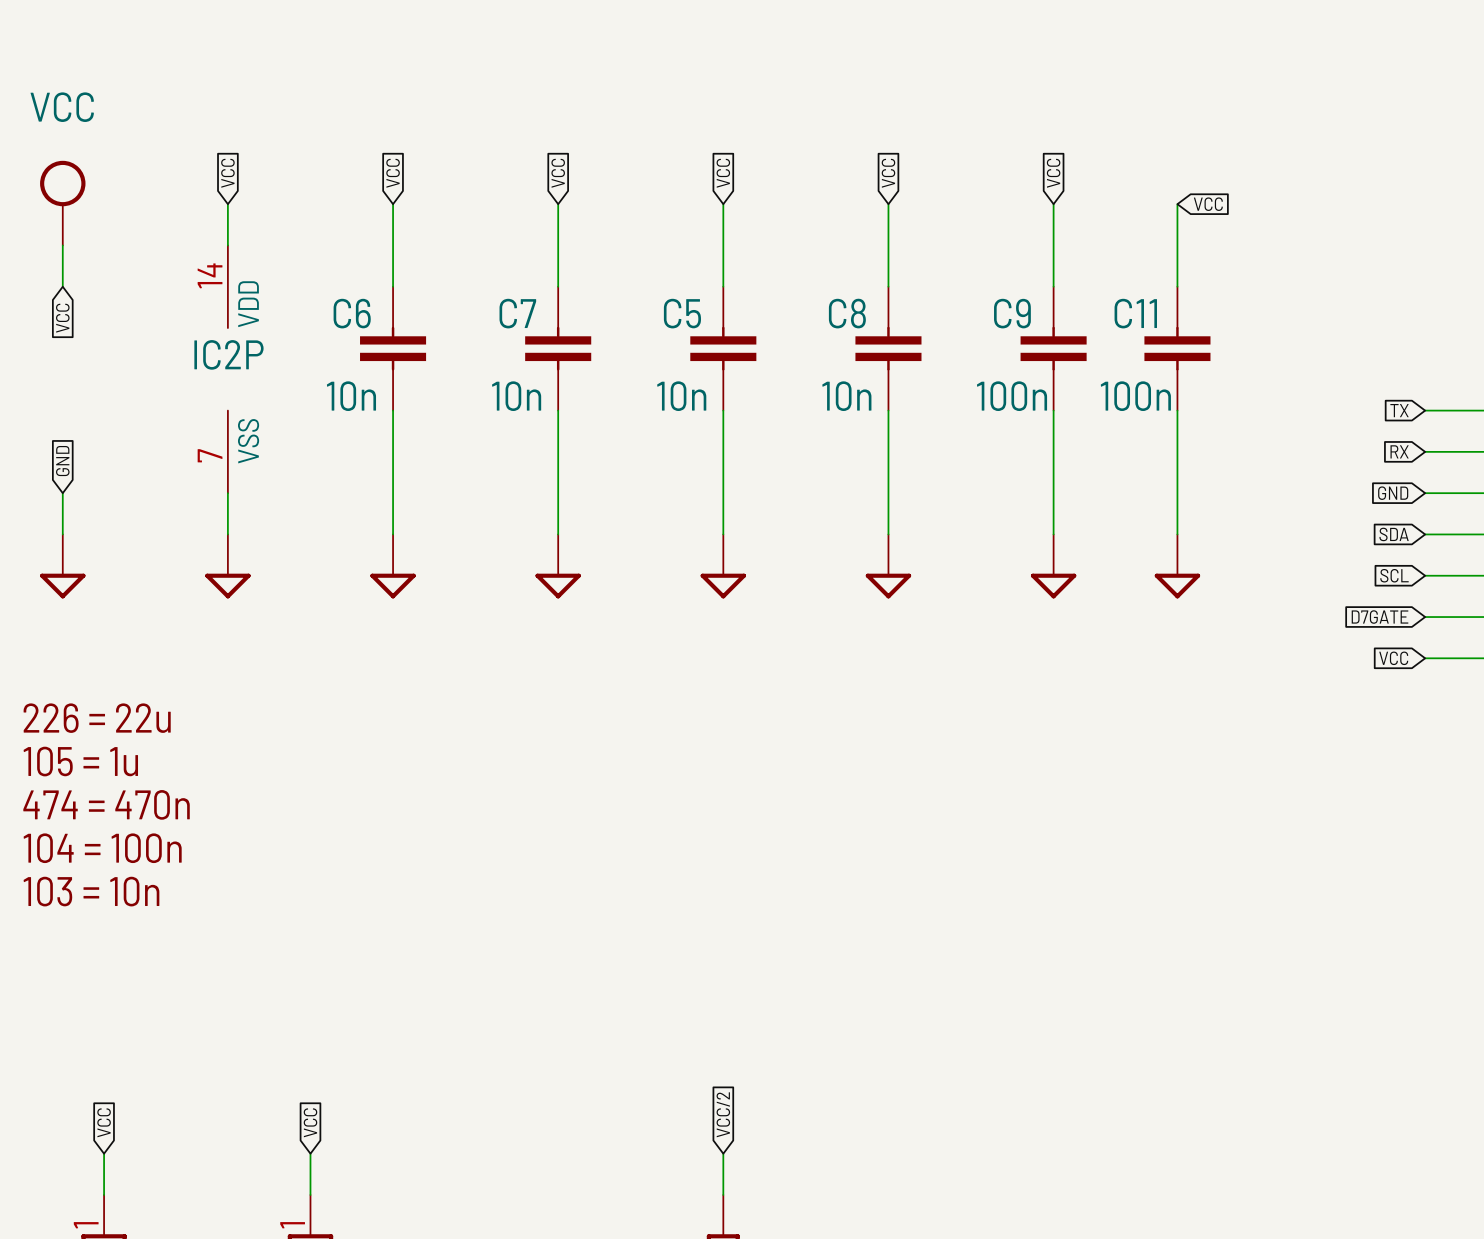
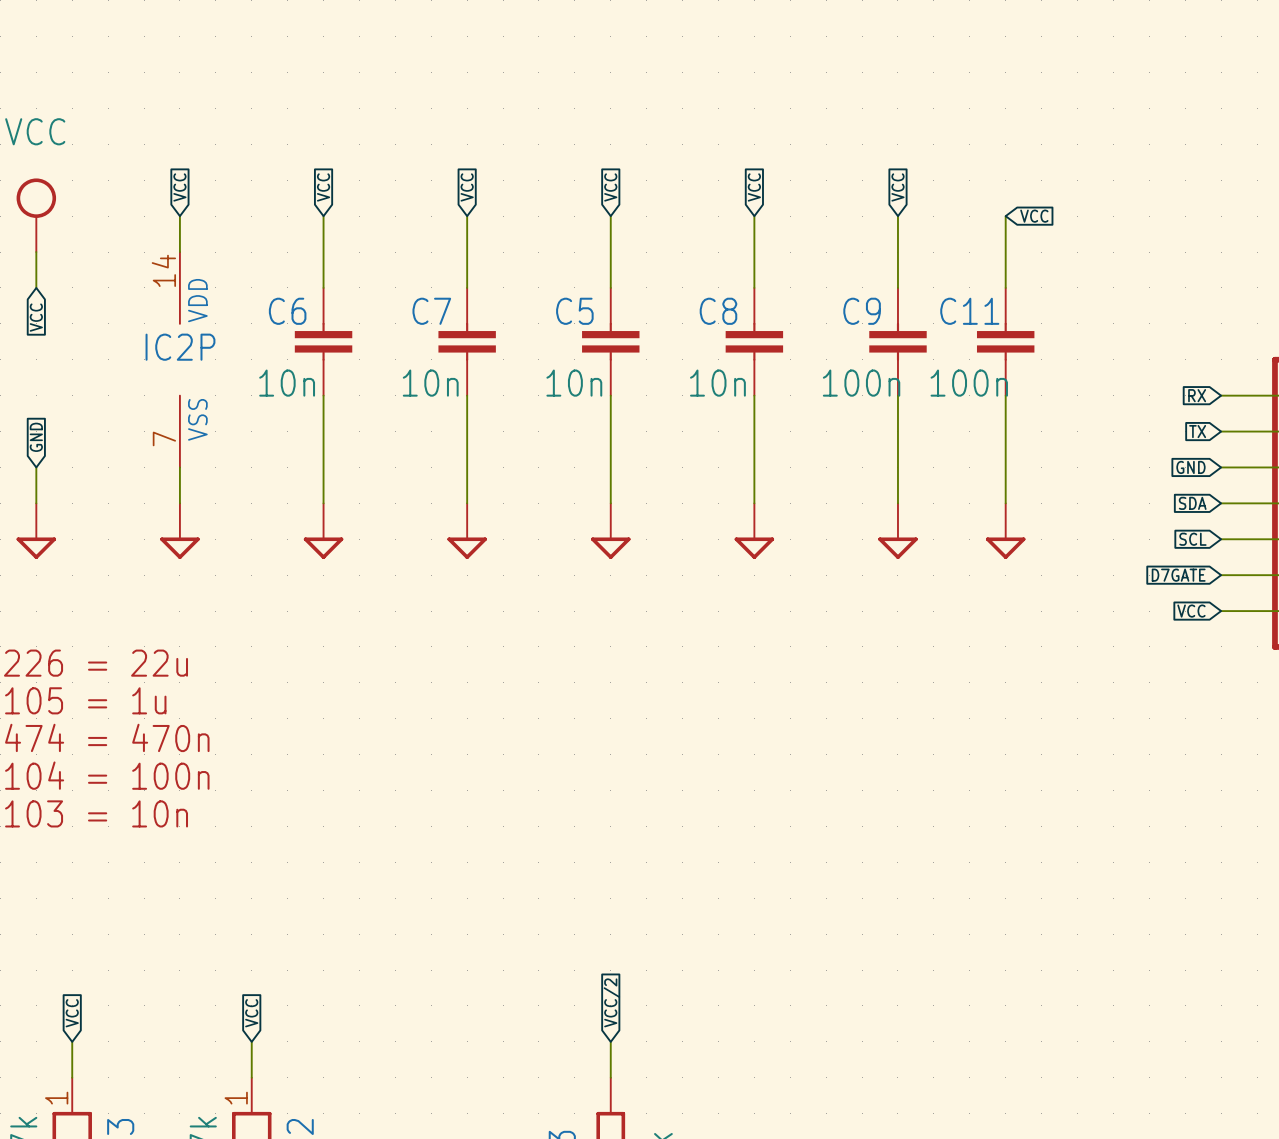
global label: TX (1399, 410) -> RX (1197, 395)
global label: RX (1399, 451) -> TX (1197, 431)

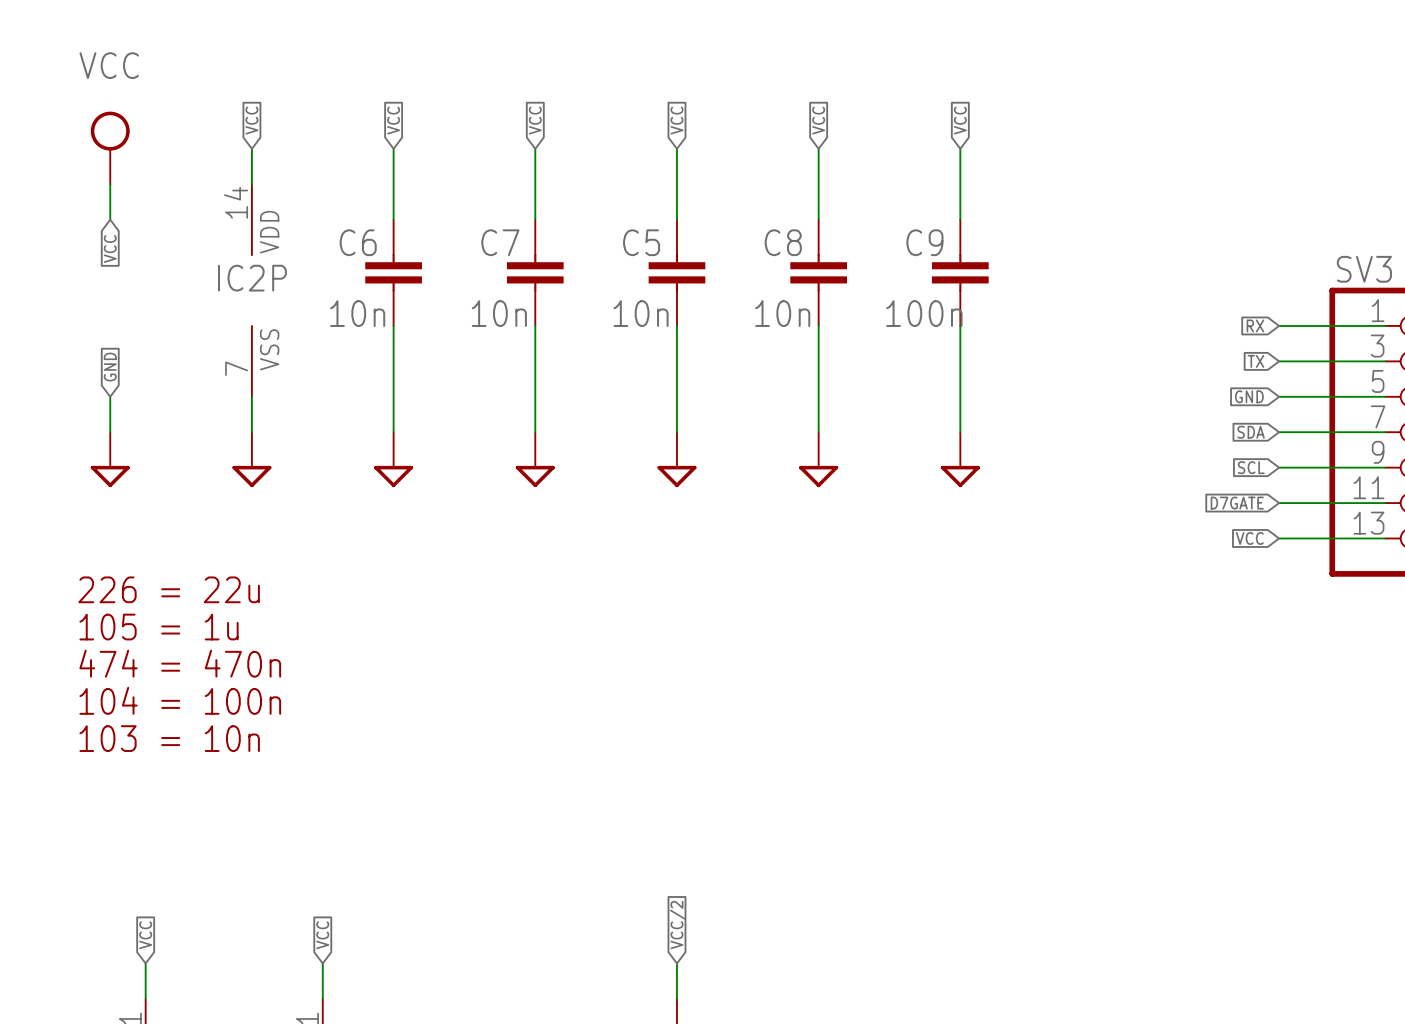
wire: (1005, 216) (1005, 287) -> none
global label: VCC (1034, 216) -> none
C11: 100n (1005, 341) -> none
wire: (1005, 395) (1005, 503) -> none
power symbol: (1005, 531) -> none

